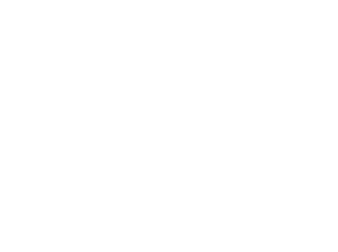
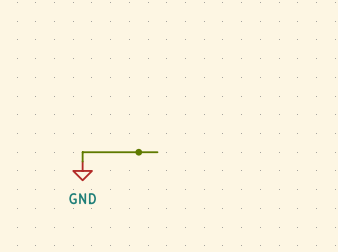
junction: none -> (138, 152)
wire: none -> (157, 152) (82, 152) (82, 161)
power symbol: none -> GND (82, 170)

